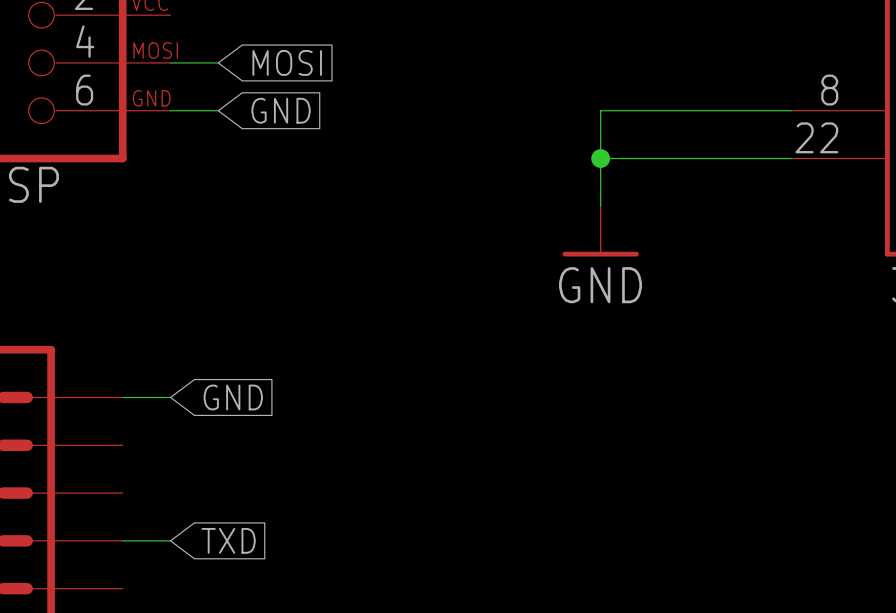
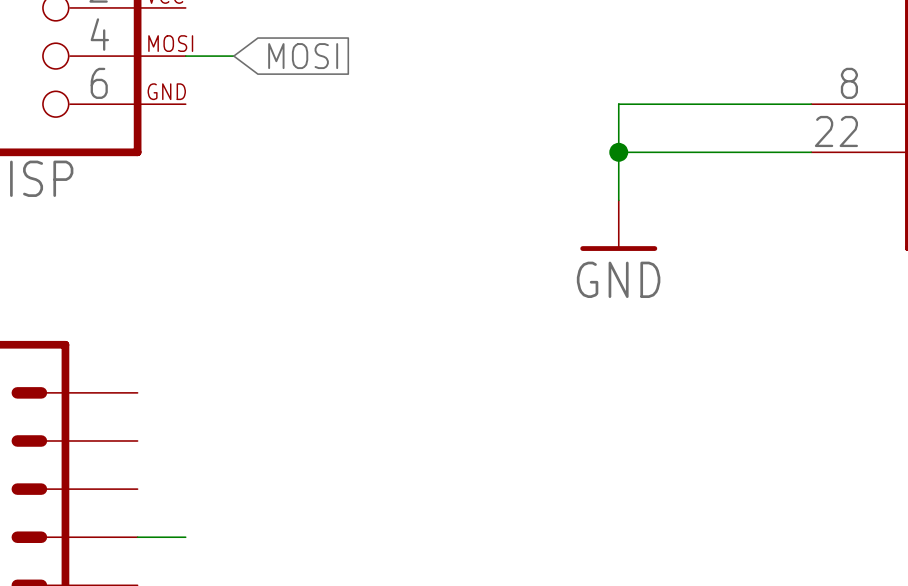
wire: (170, 110) (218, 110) -> none
global label: GND (281, 110) -> none
wire: (122, 397) (170, 397) -> none
global label: GND (233, 397) -> none
global label: TXD (228, 540) -> none

